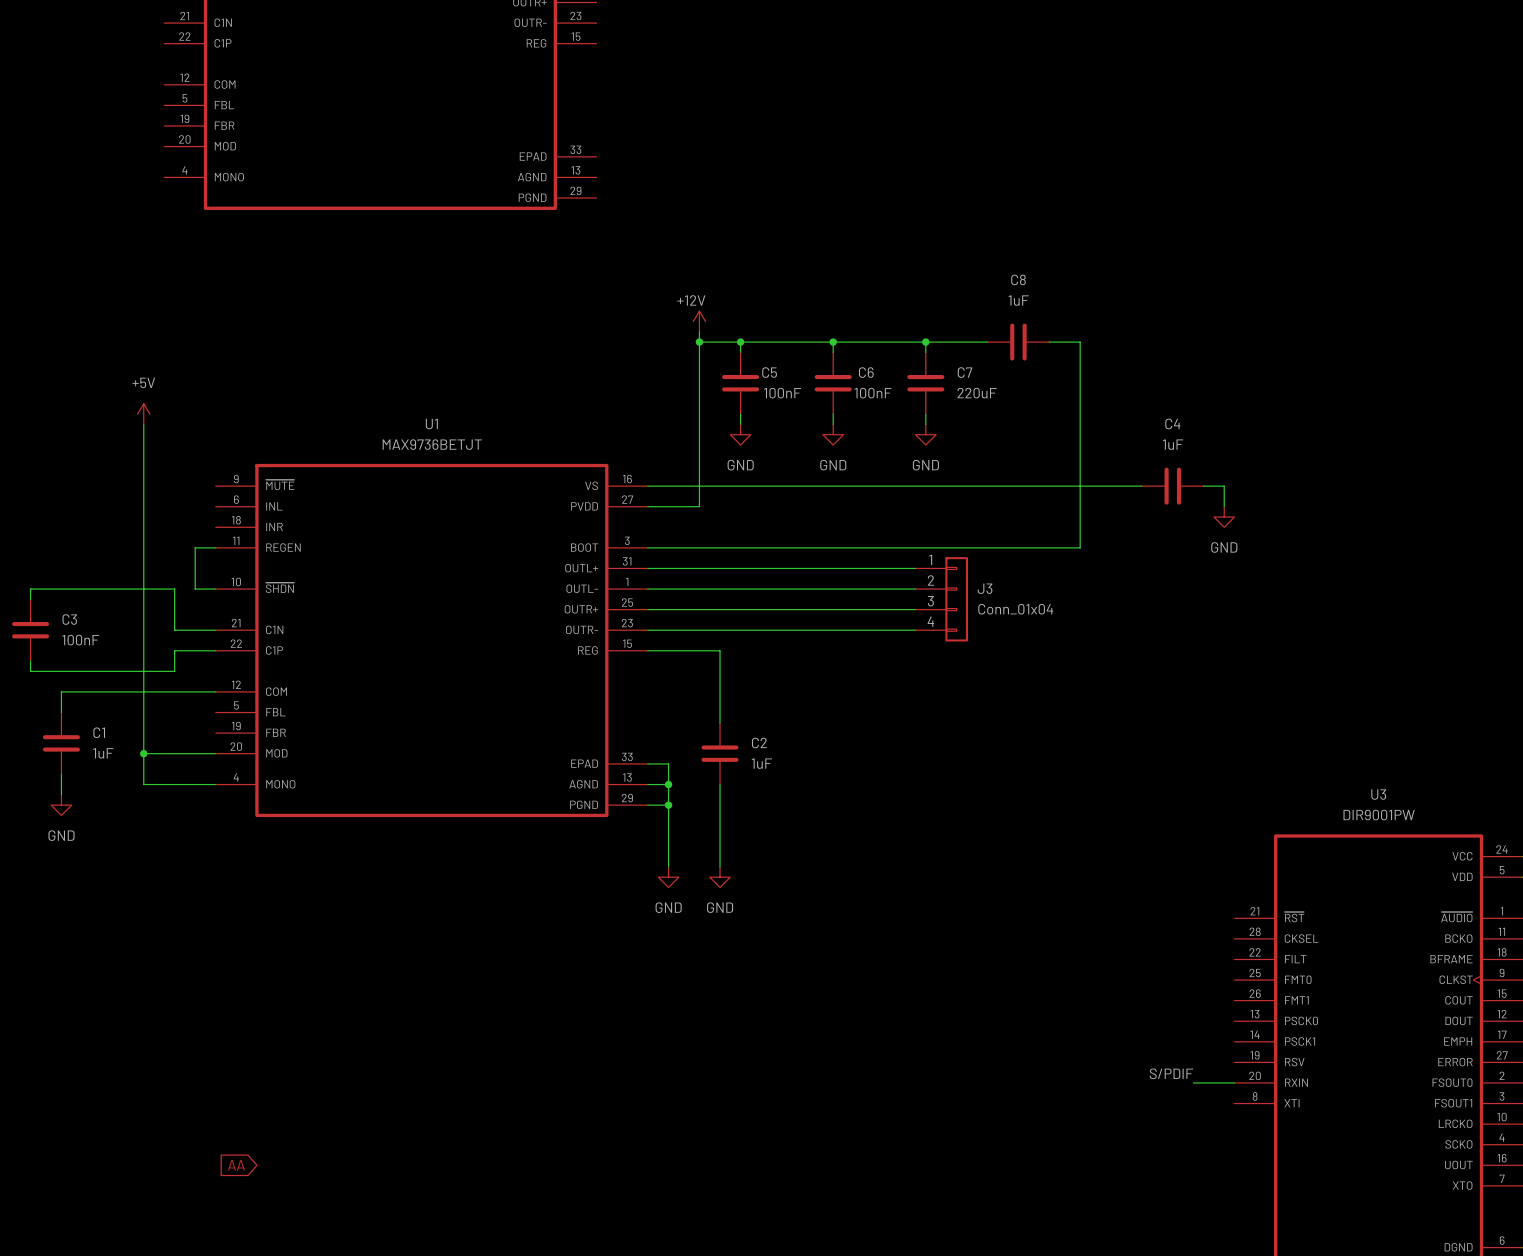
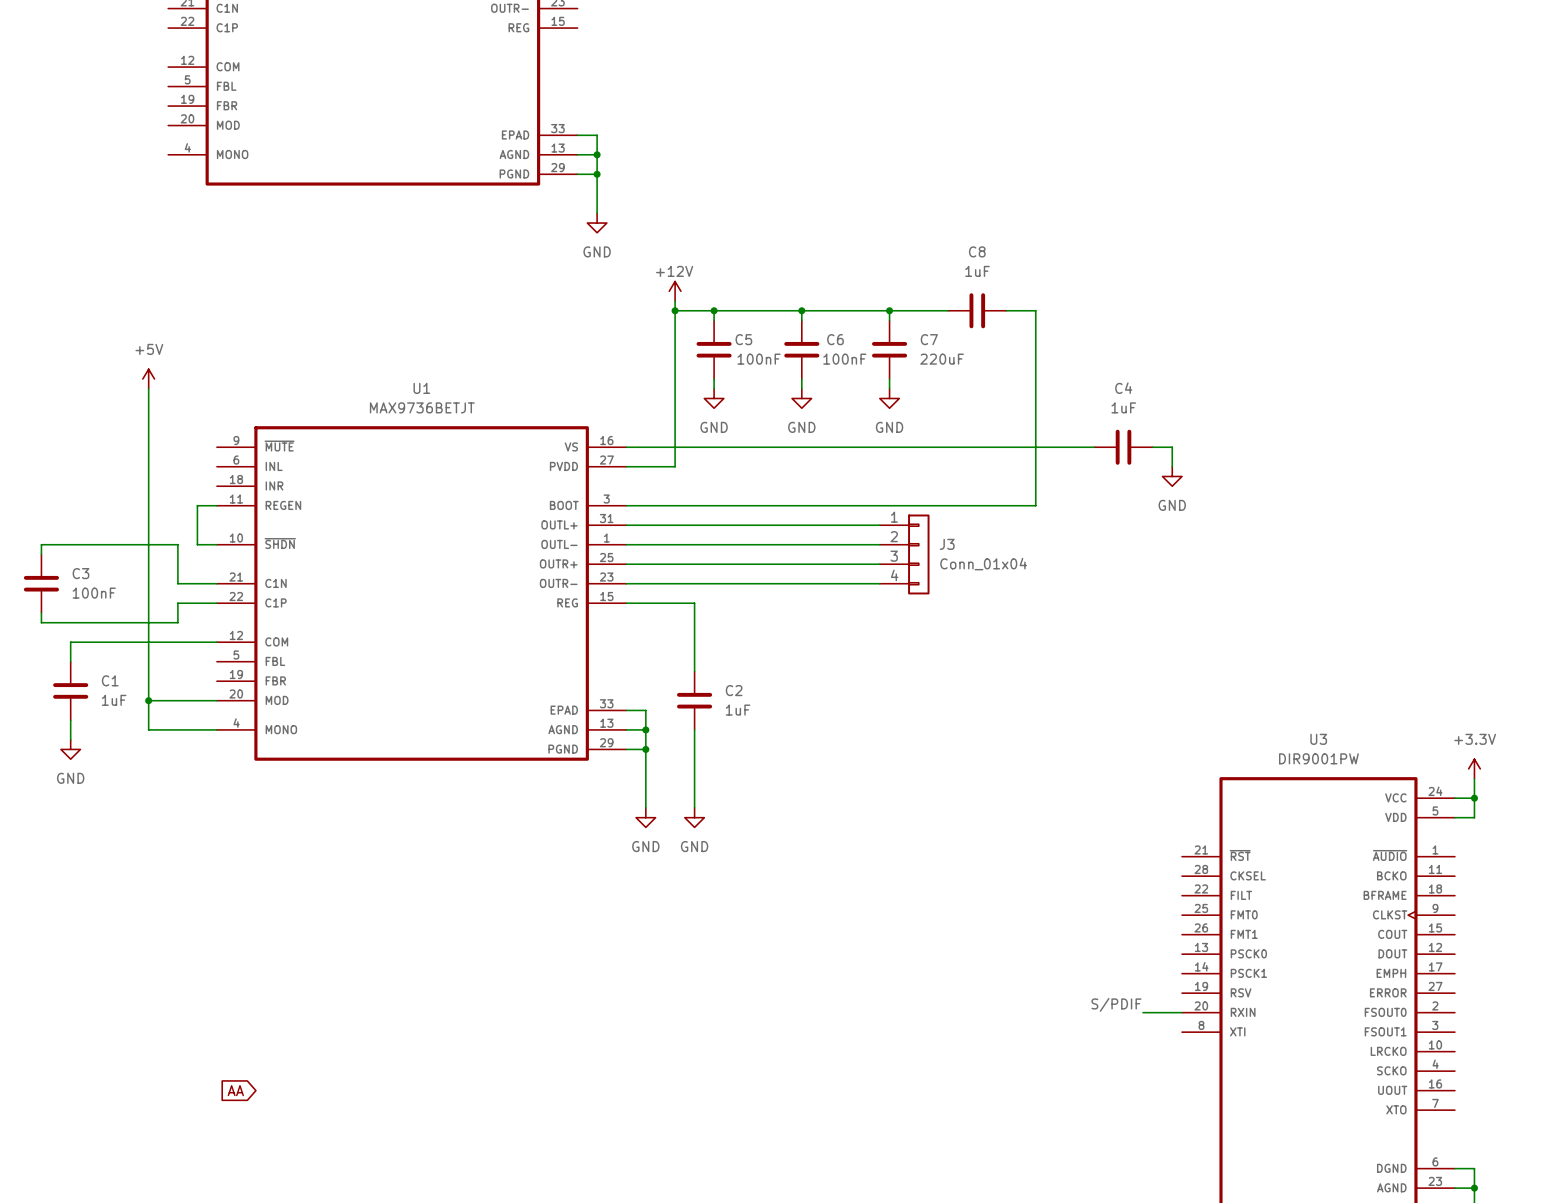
wire: none -> (577, 135) (597, 135) (597, 213)
wire: none -> (577, 154) (597, 154)
junction: none -> (597, 154)
wire: none -> (577, 174) (597, 174)
junction: none -> (597, 174)
power symbol: none -> GND (597, 223)

